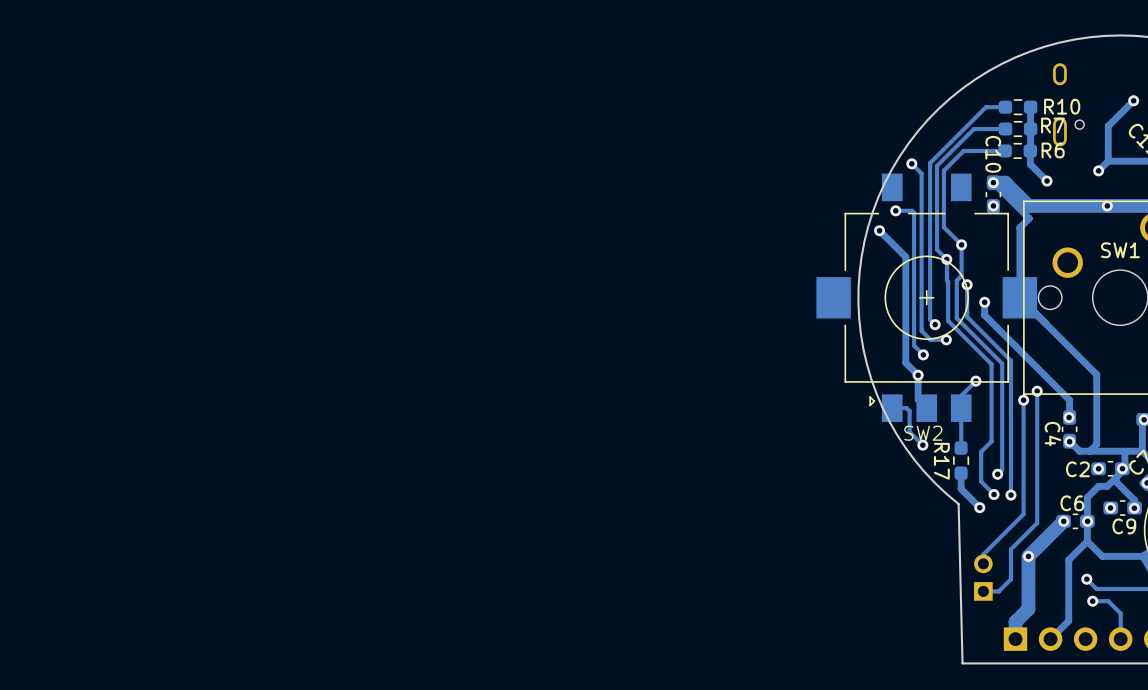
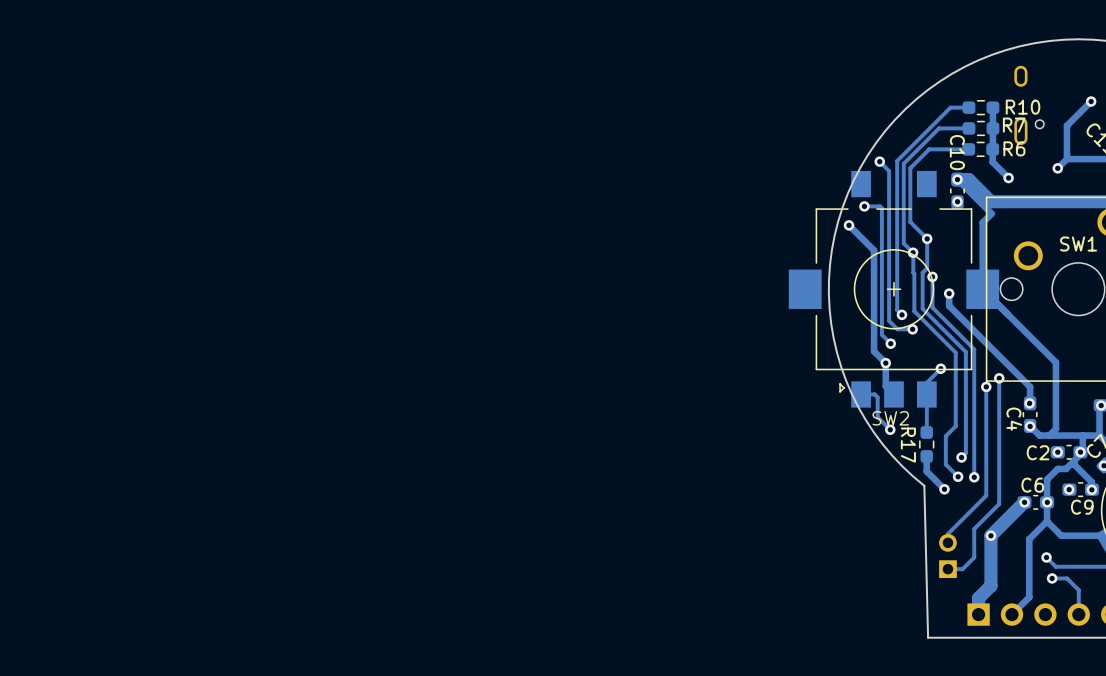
via: (1107, 205) -> none

